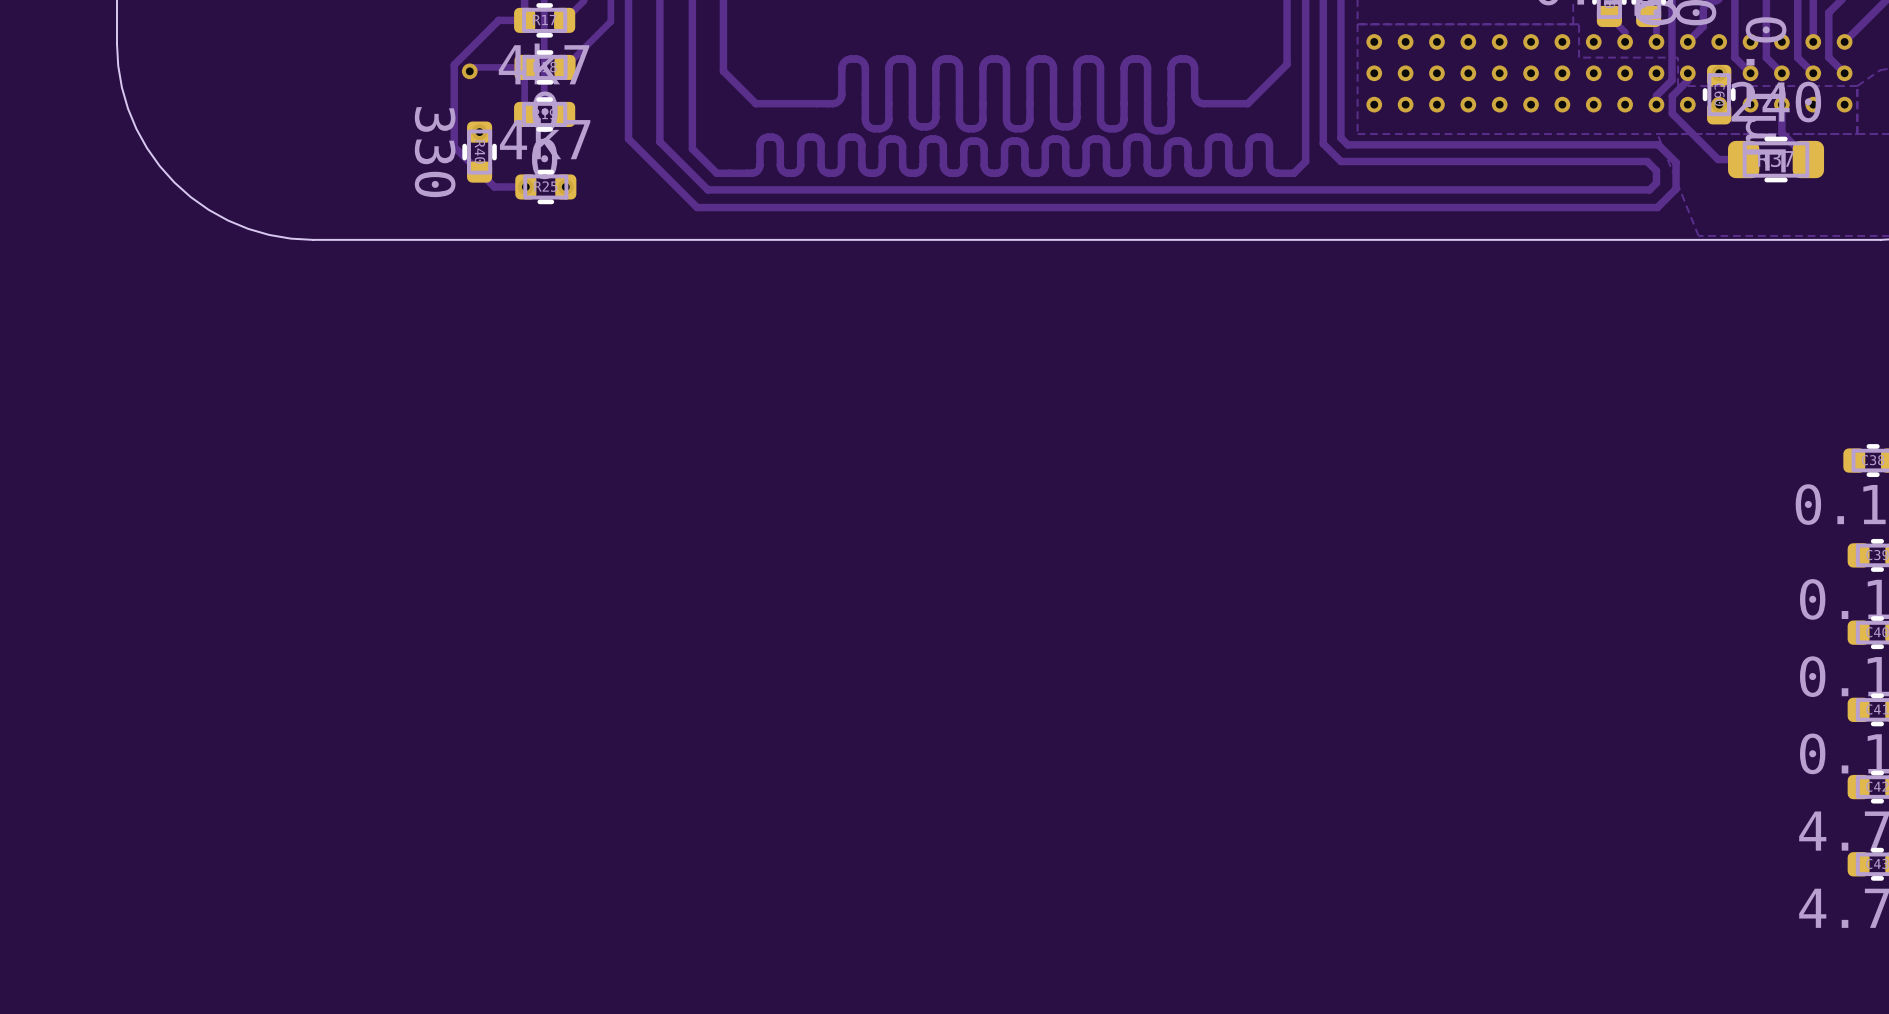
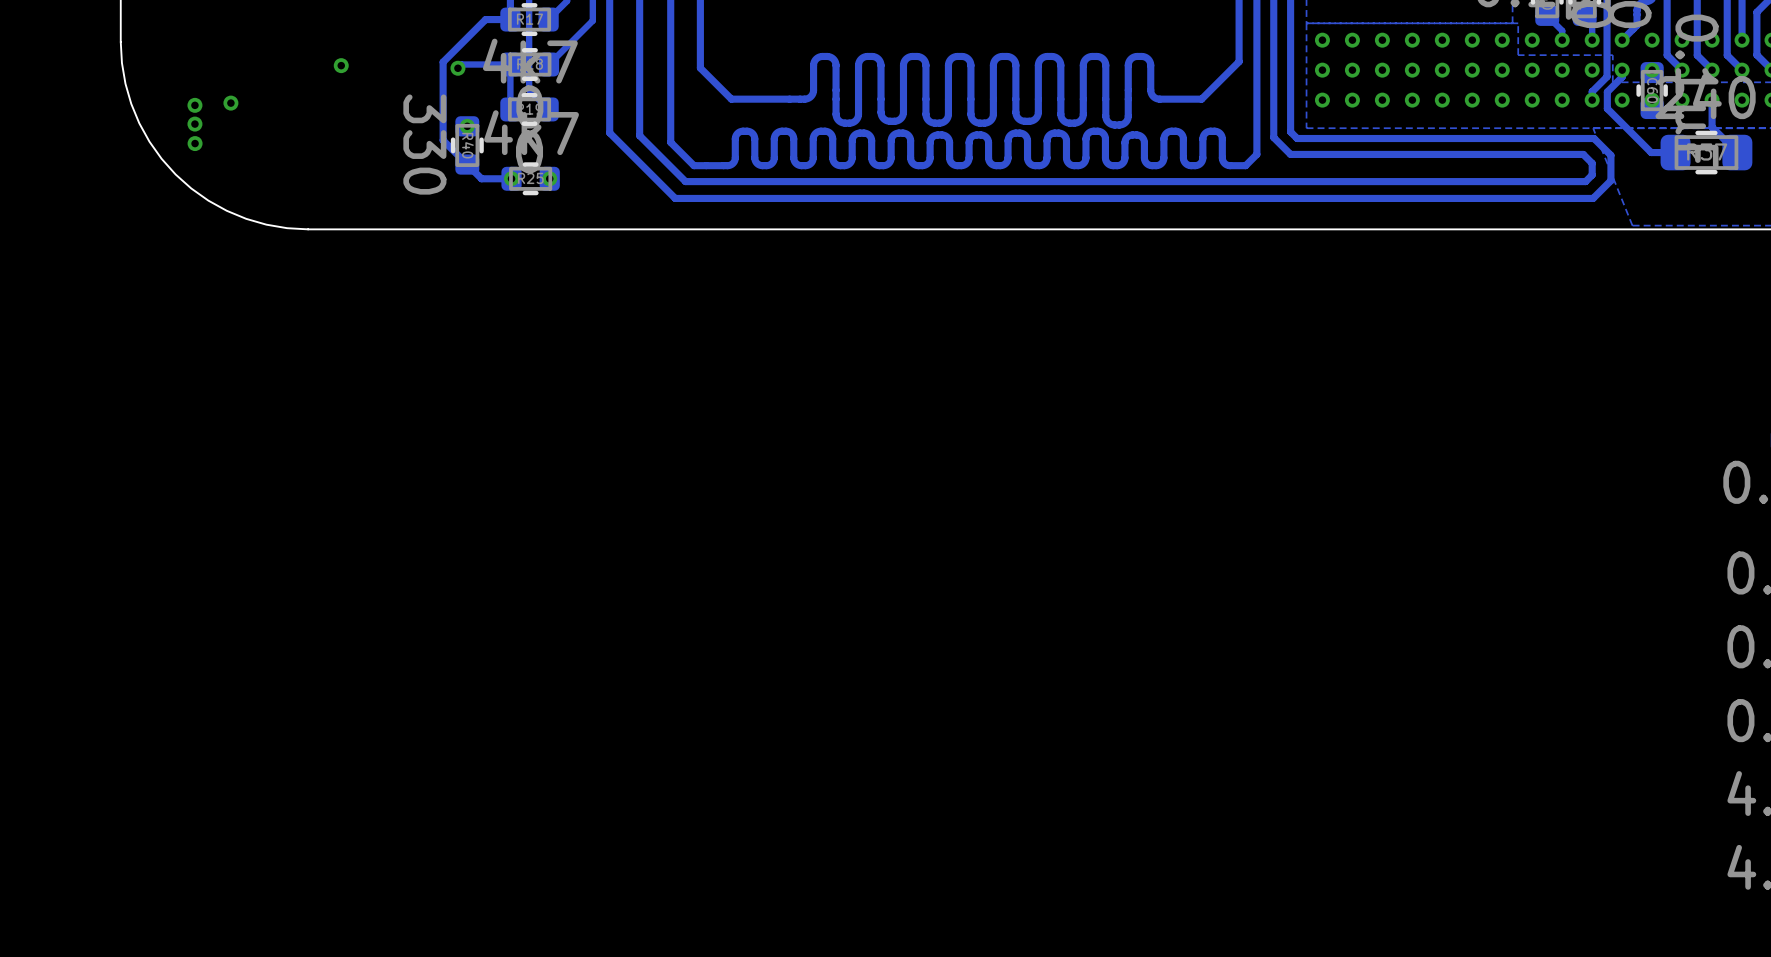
via: none -> (341, 65)
via: none -> (230, 103)
via: none -> (194, 105)
via: none -> (194, 124)
via: none -> (195, 143)

